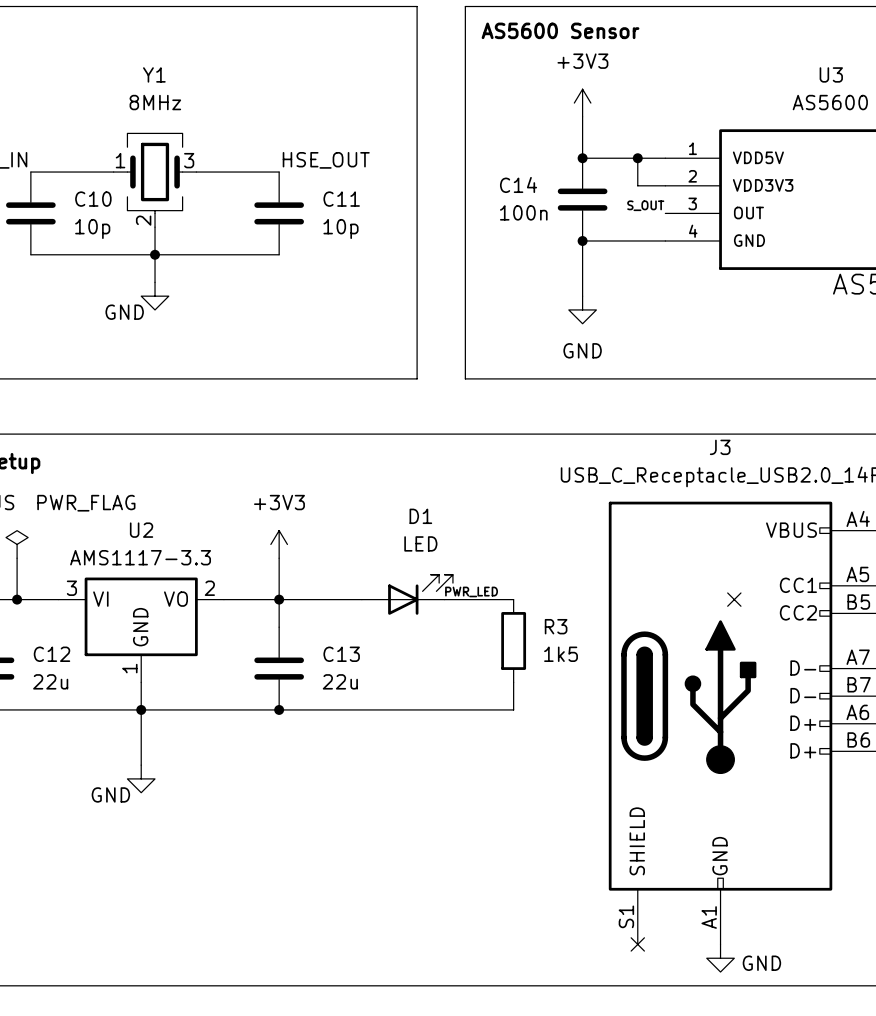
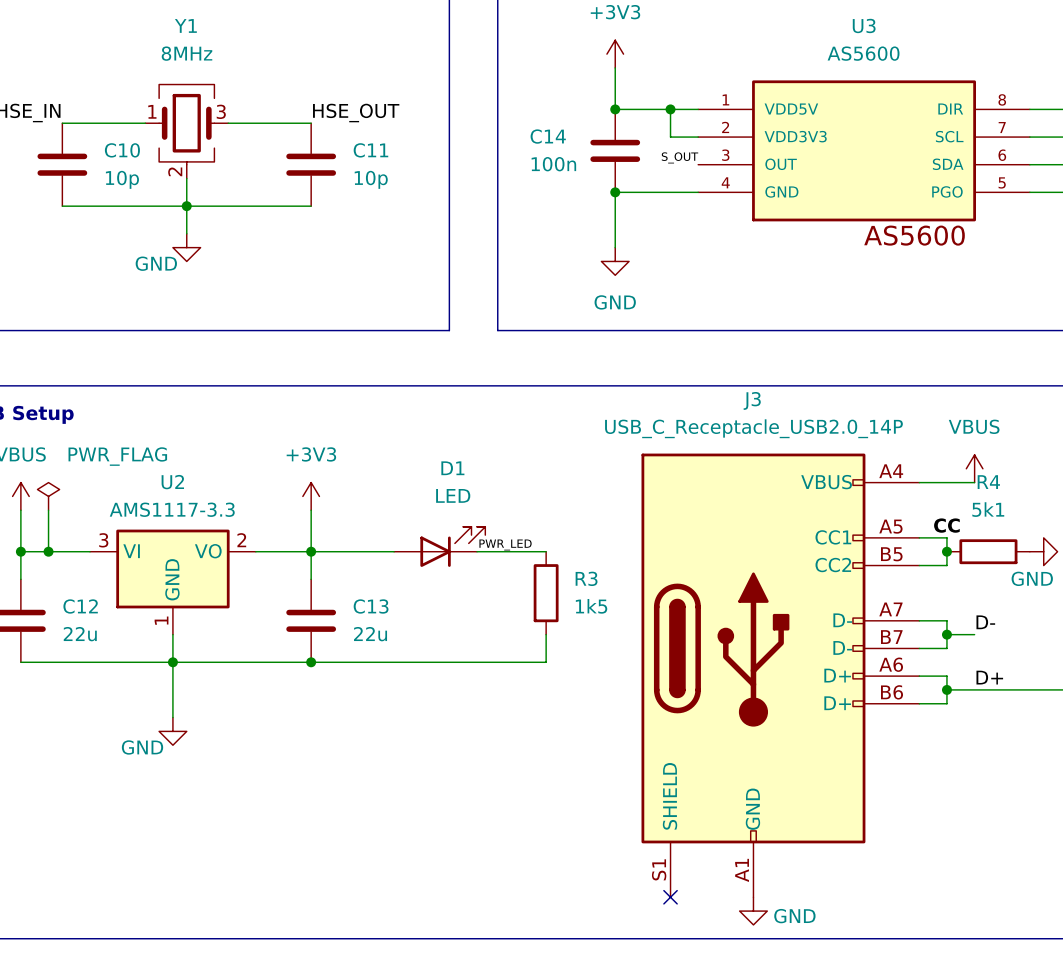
no-connect mark: (734, 599) -> none

